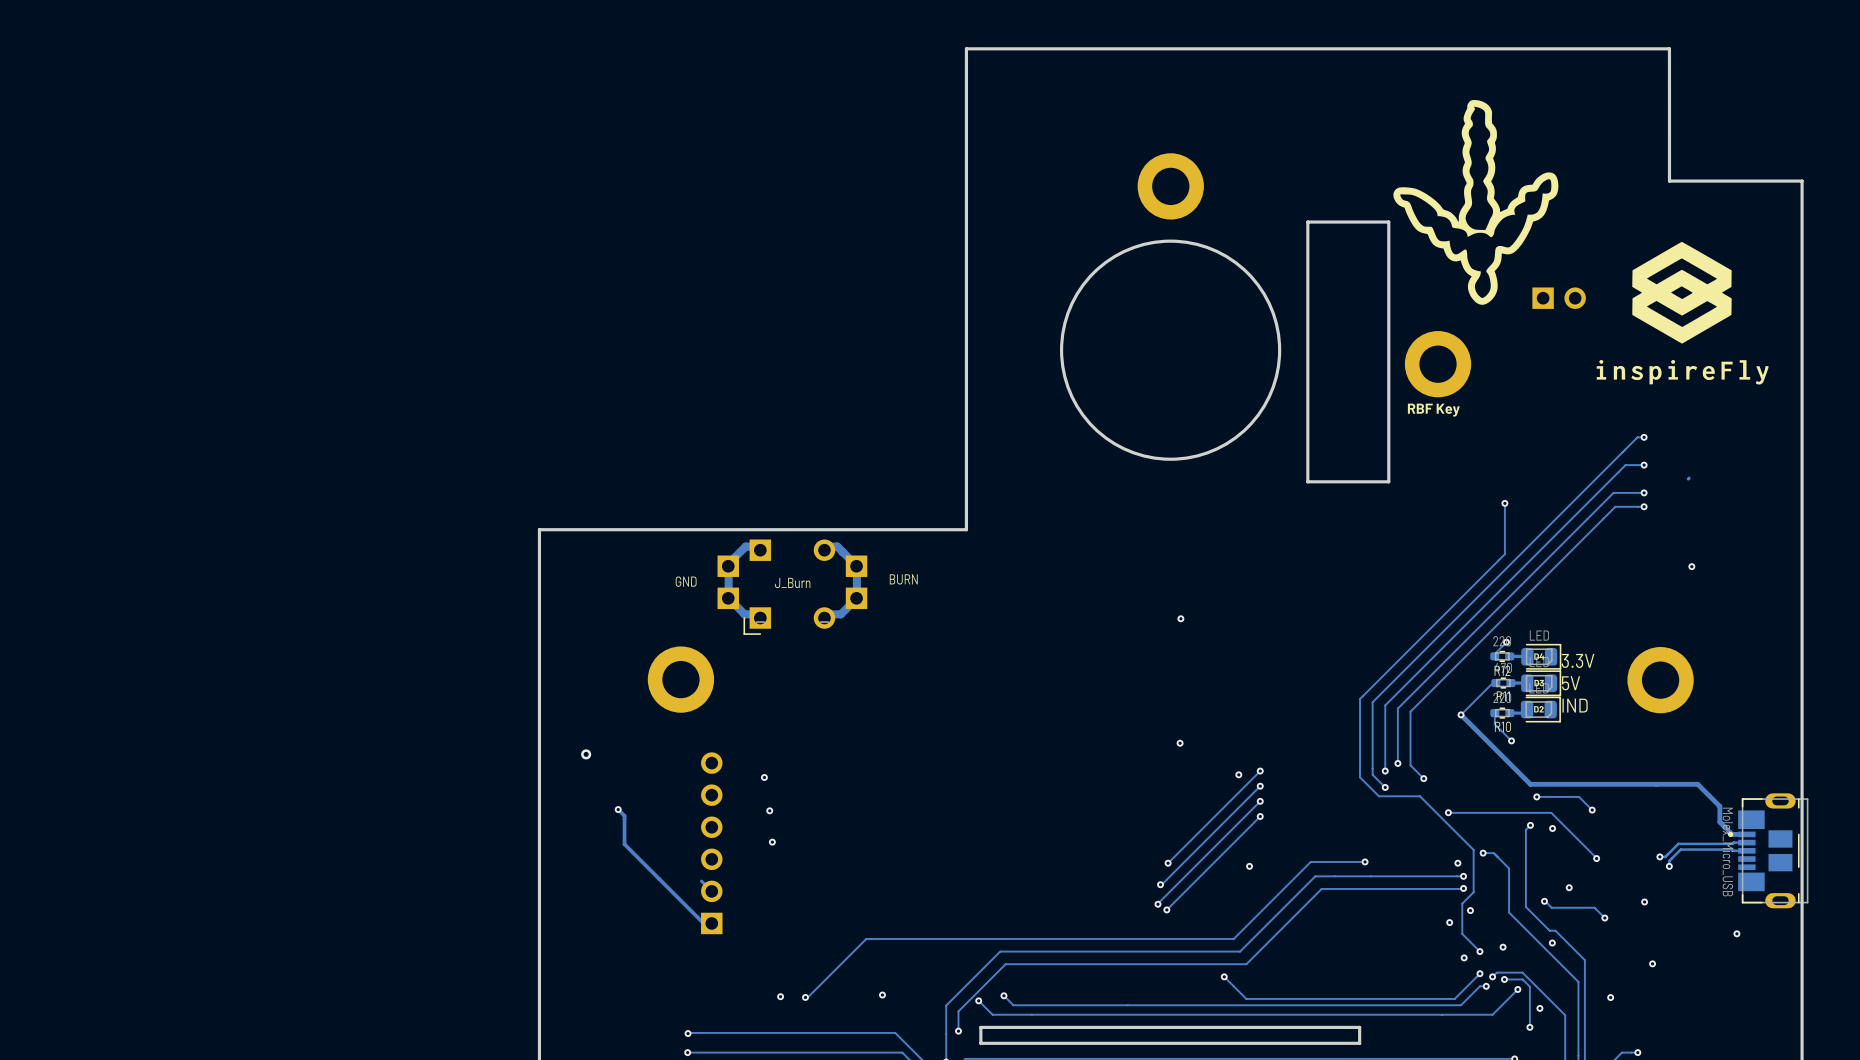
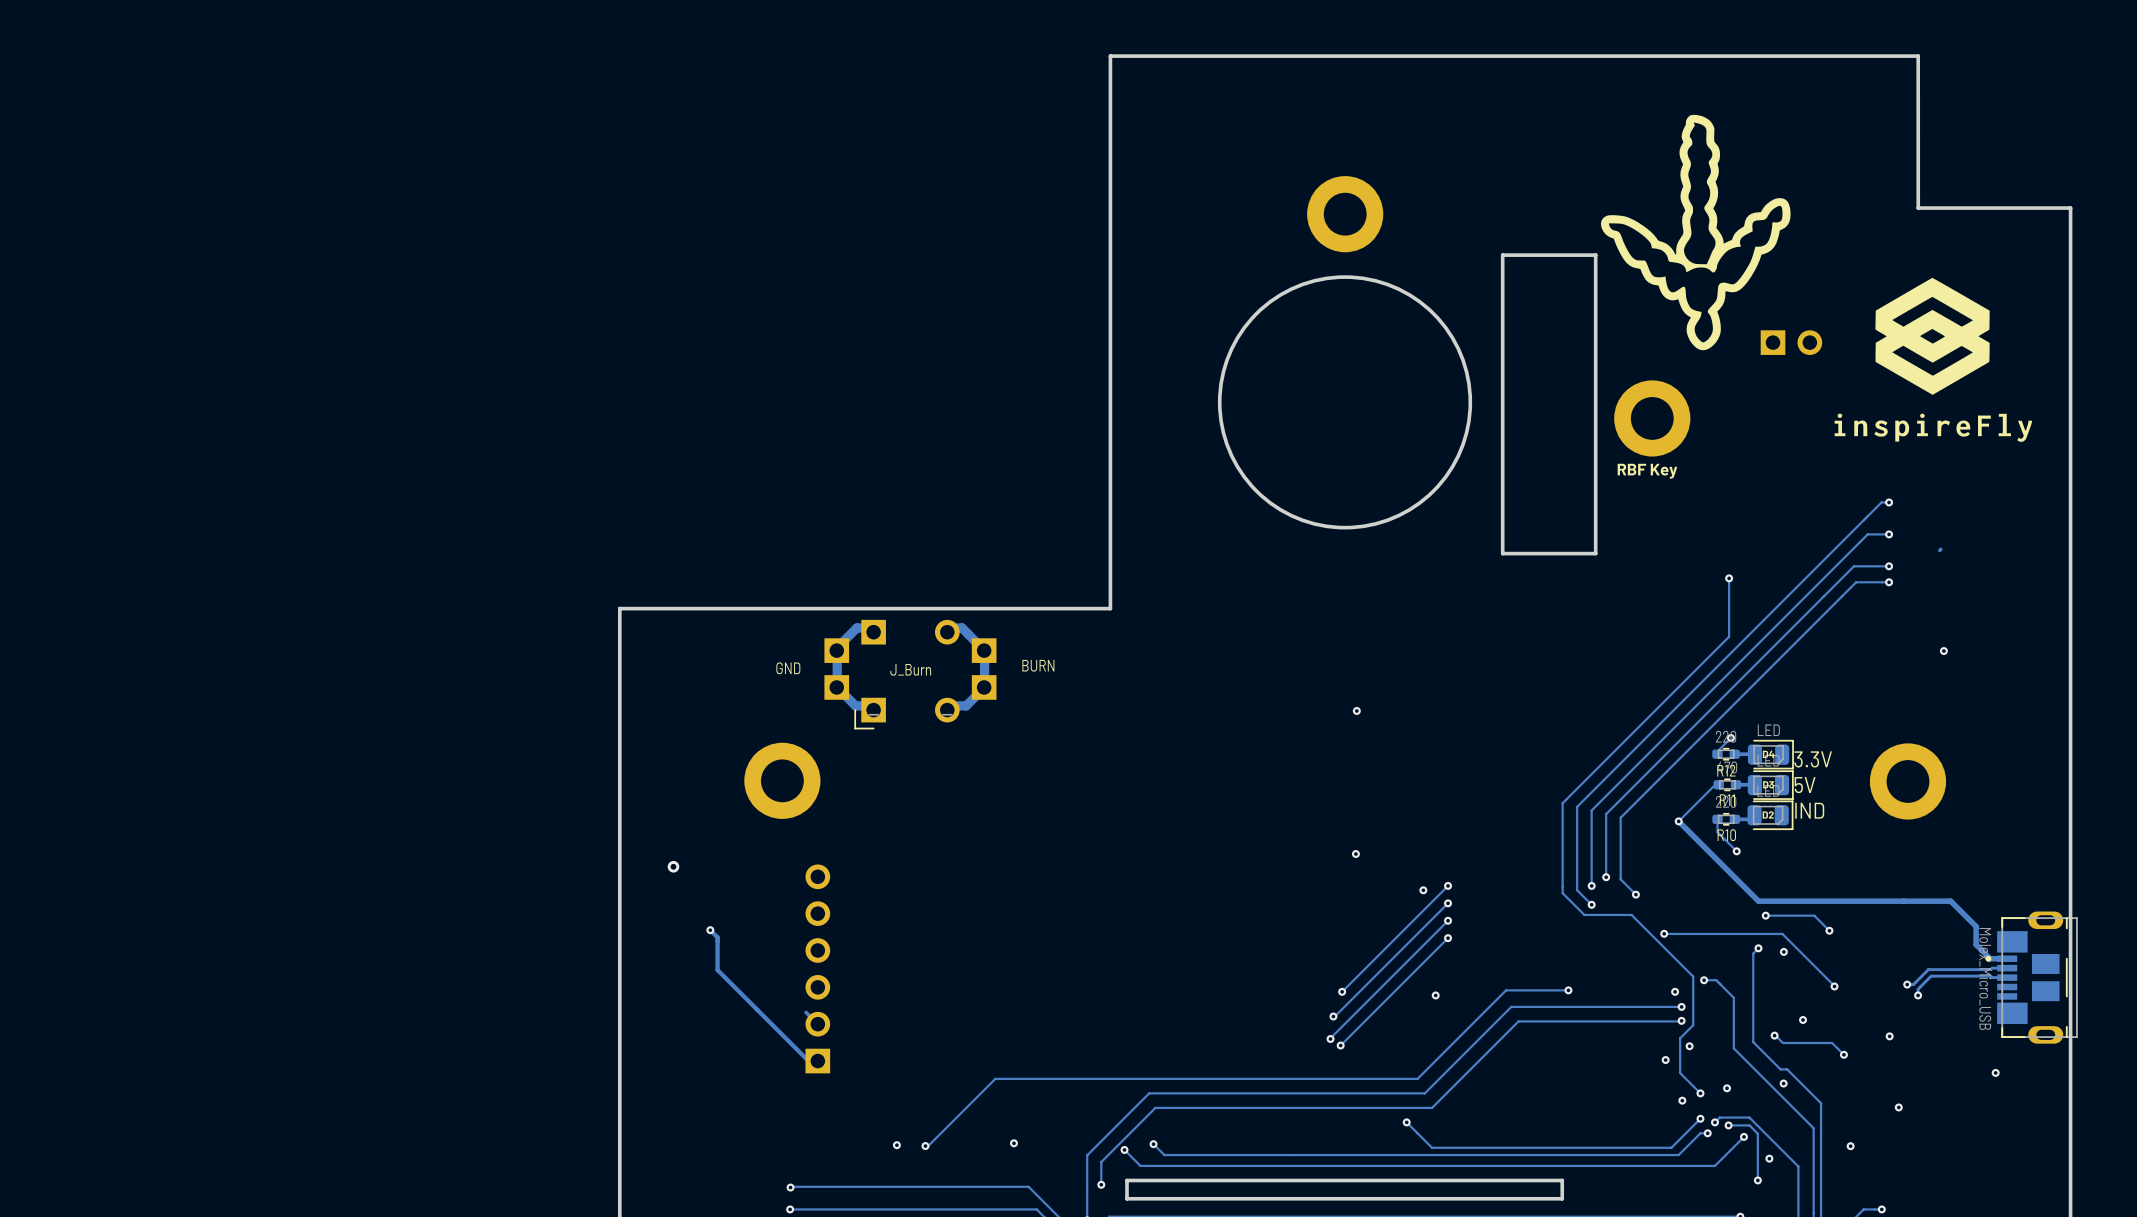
via: (764, 777) -> none
via: (769, 810) -> none
via: (772, 842) -> none

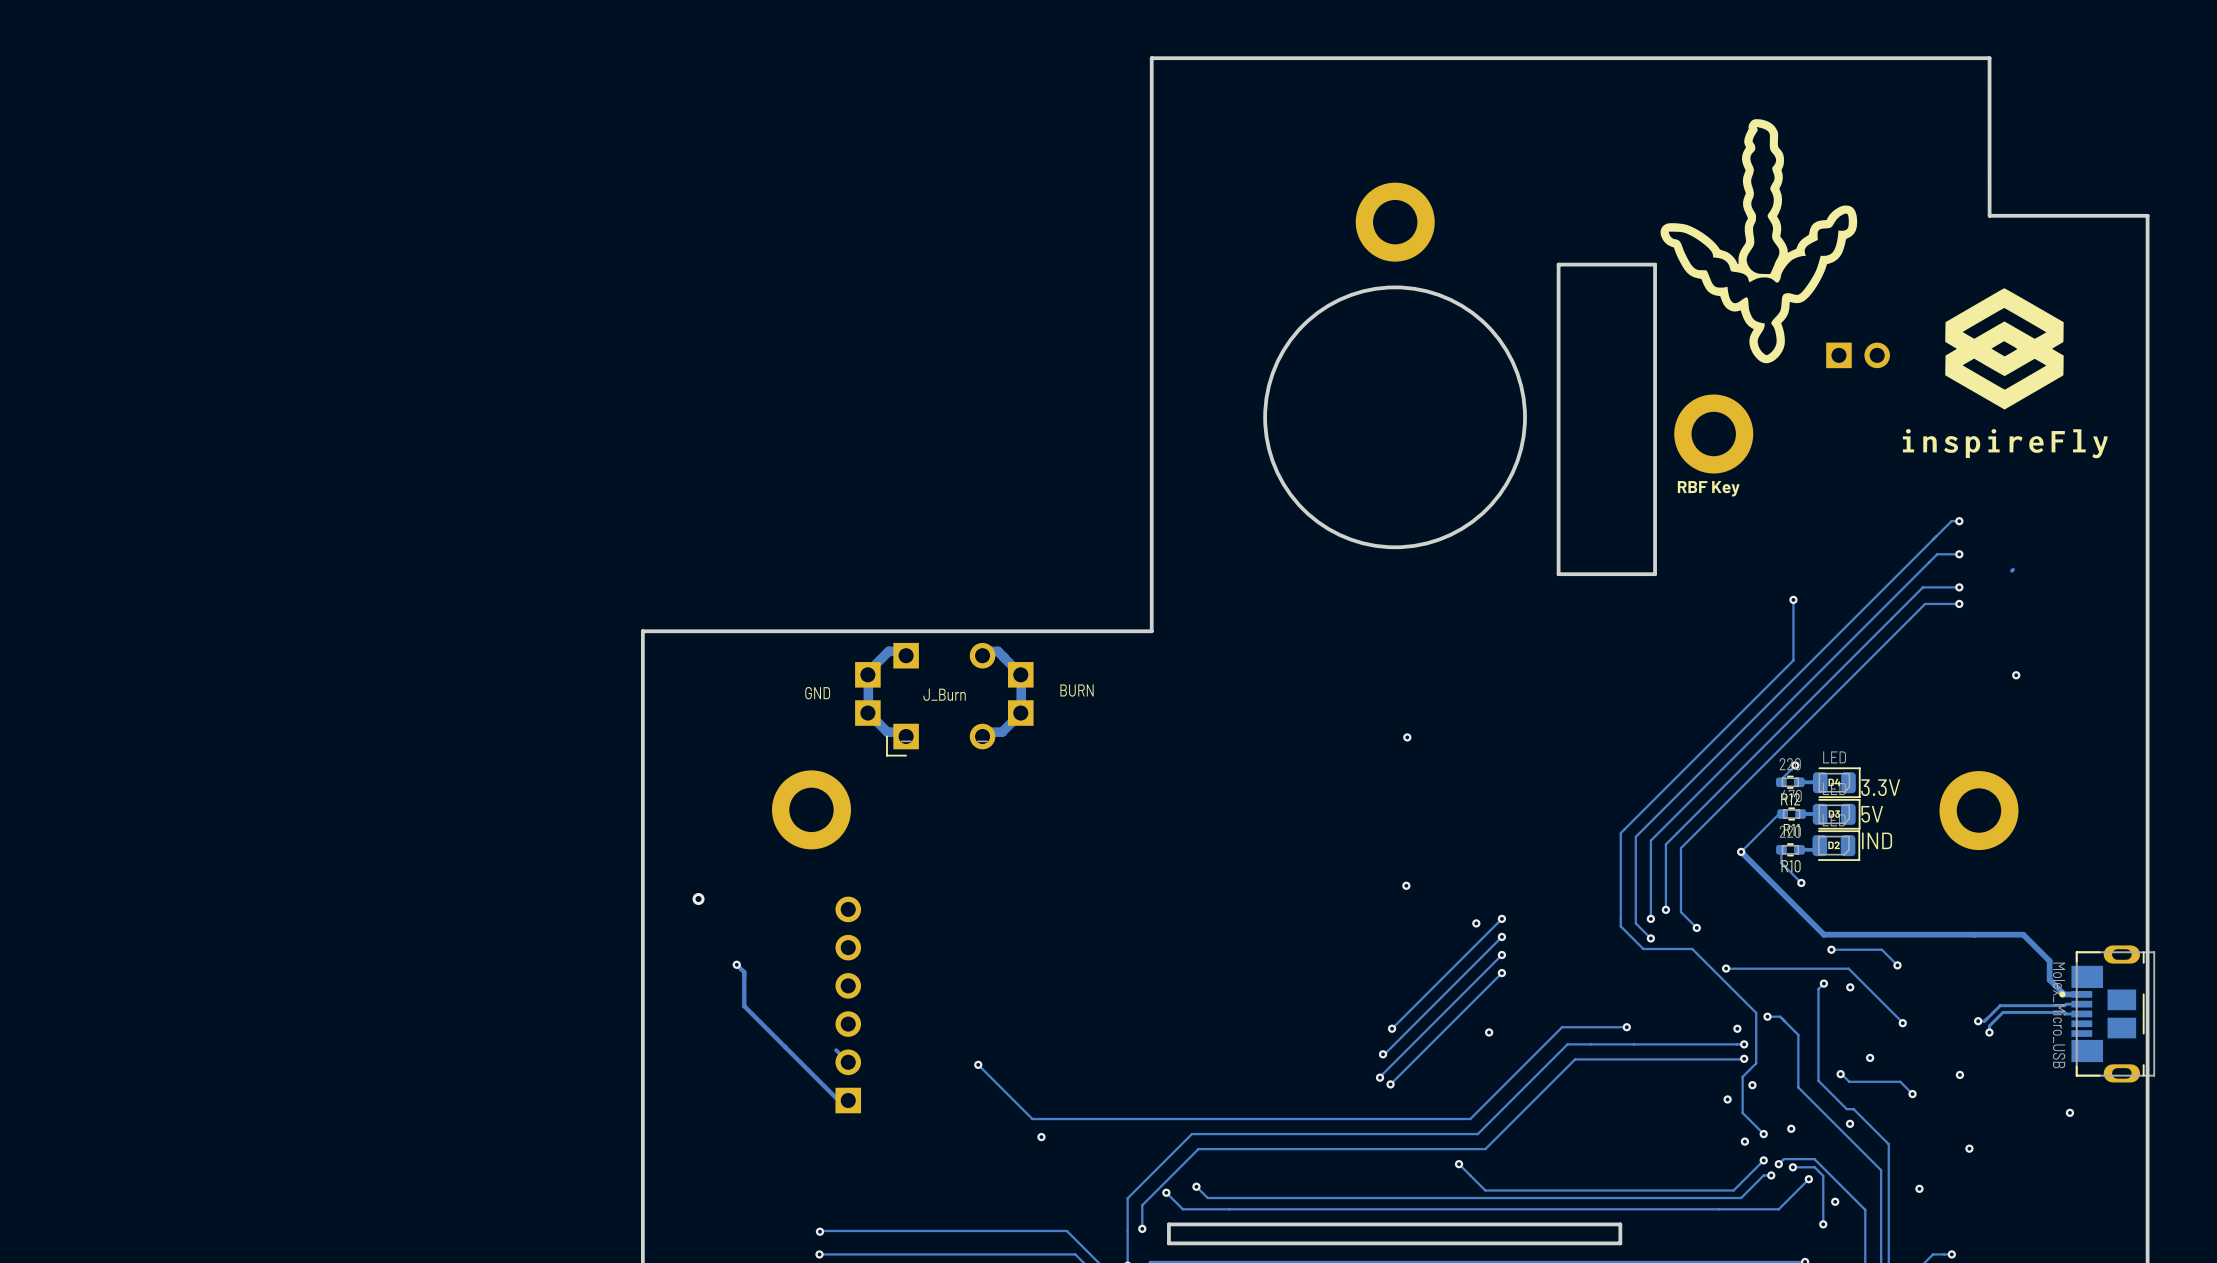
via: none -> (978, 1064)
track: (995, 1078) (928, 1146) (925, 1146) -> (1032, 1119) (978, 1064)
via: none -> (1041, 1137)
via: (1013, 1143) -> none
via: (896, 1145) -> none
via: (925, 1146) -> none

